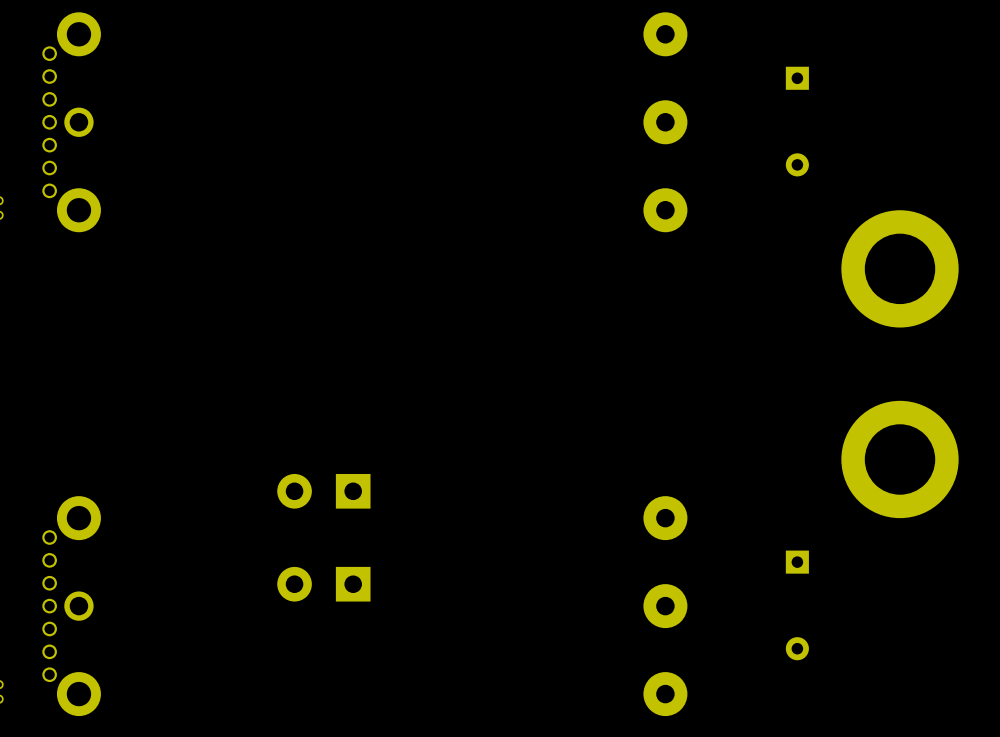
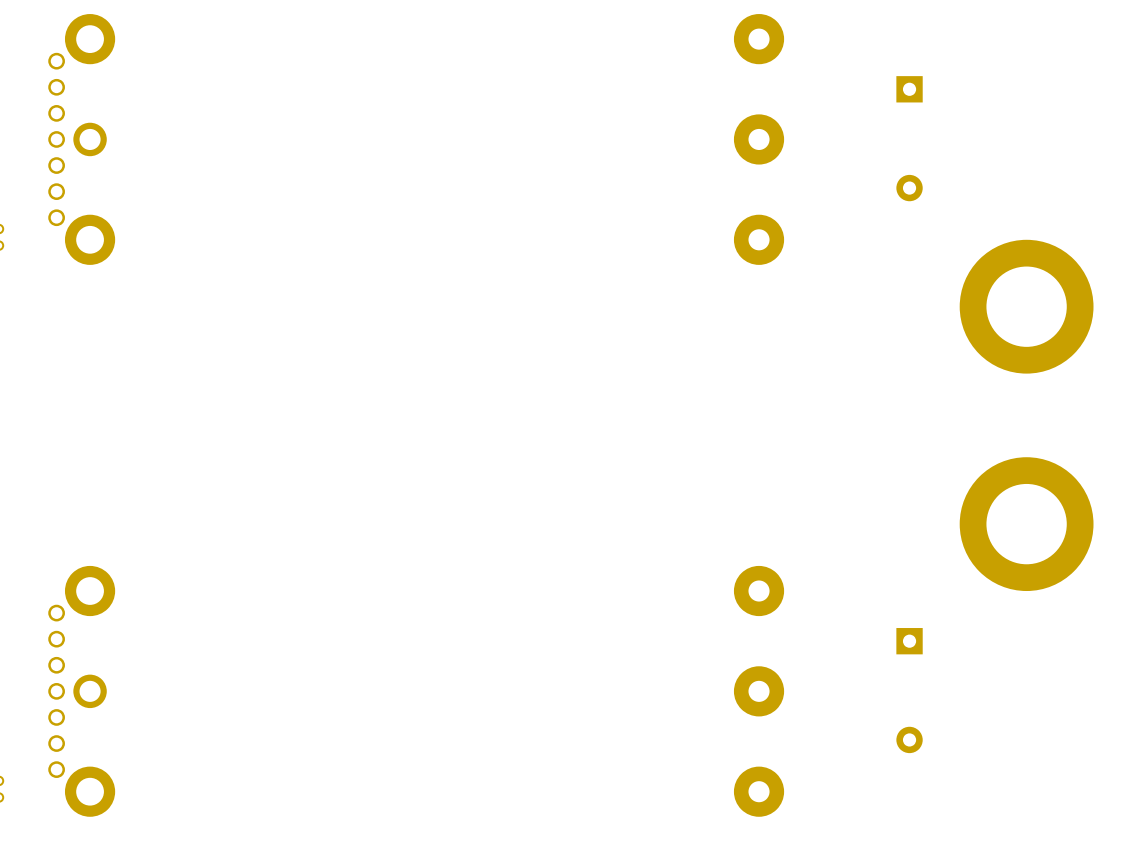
part: (323, 491) -> none
part: (323, 584) -> none

